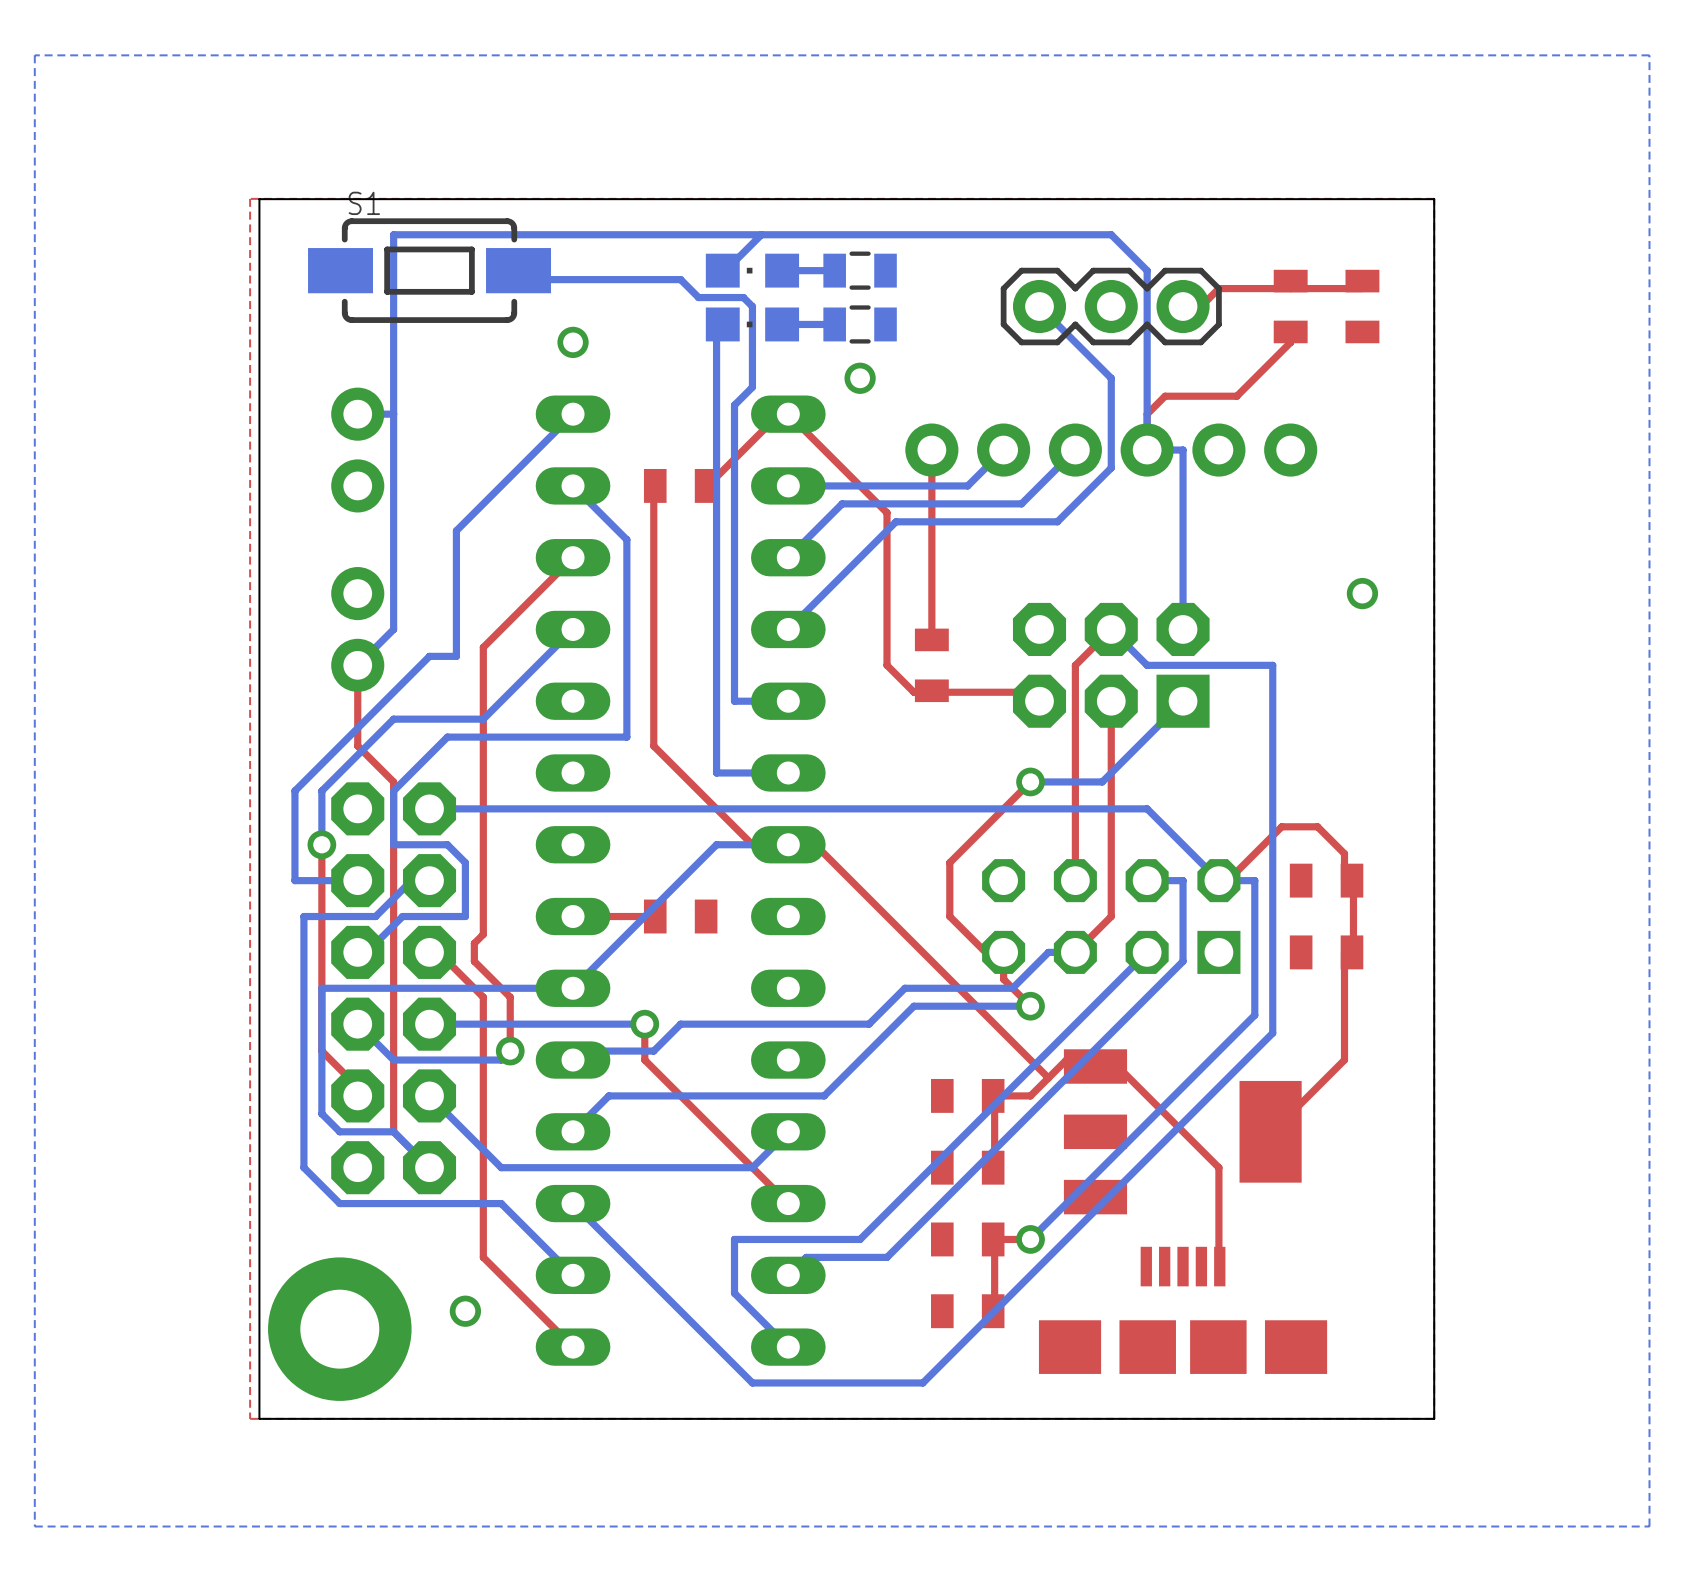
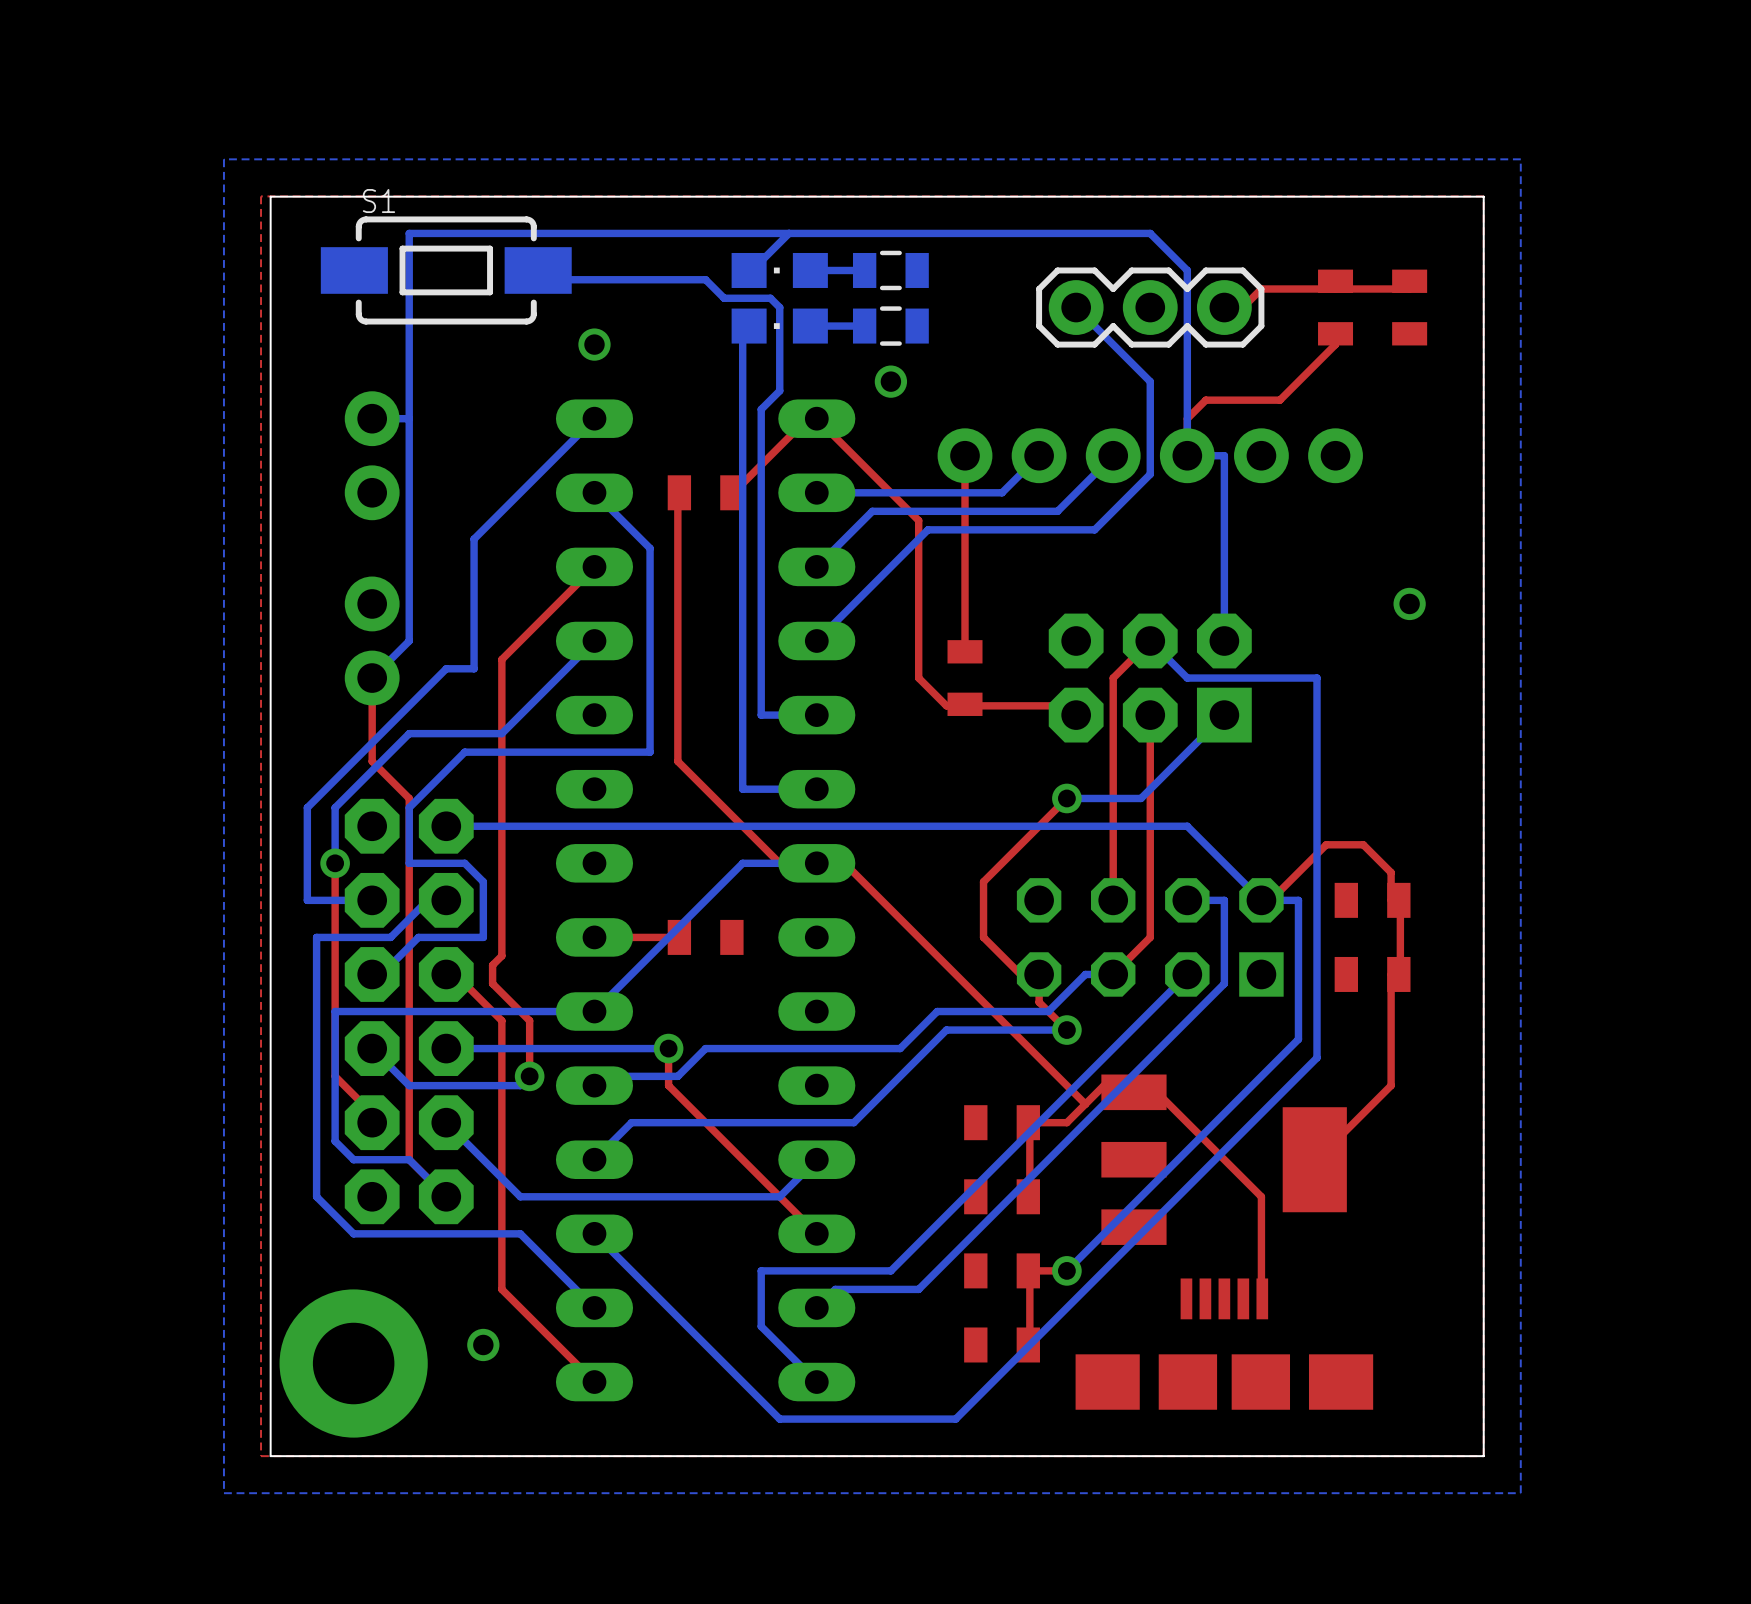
bottom zone outline: (1649, 55) (34, 55) (34, 1526) (1649, 1526) (1649, 55) -> (1520, 159) (1520, 1493) (223, 1493) (223, 159) (1520, 159)

